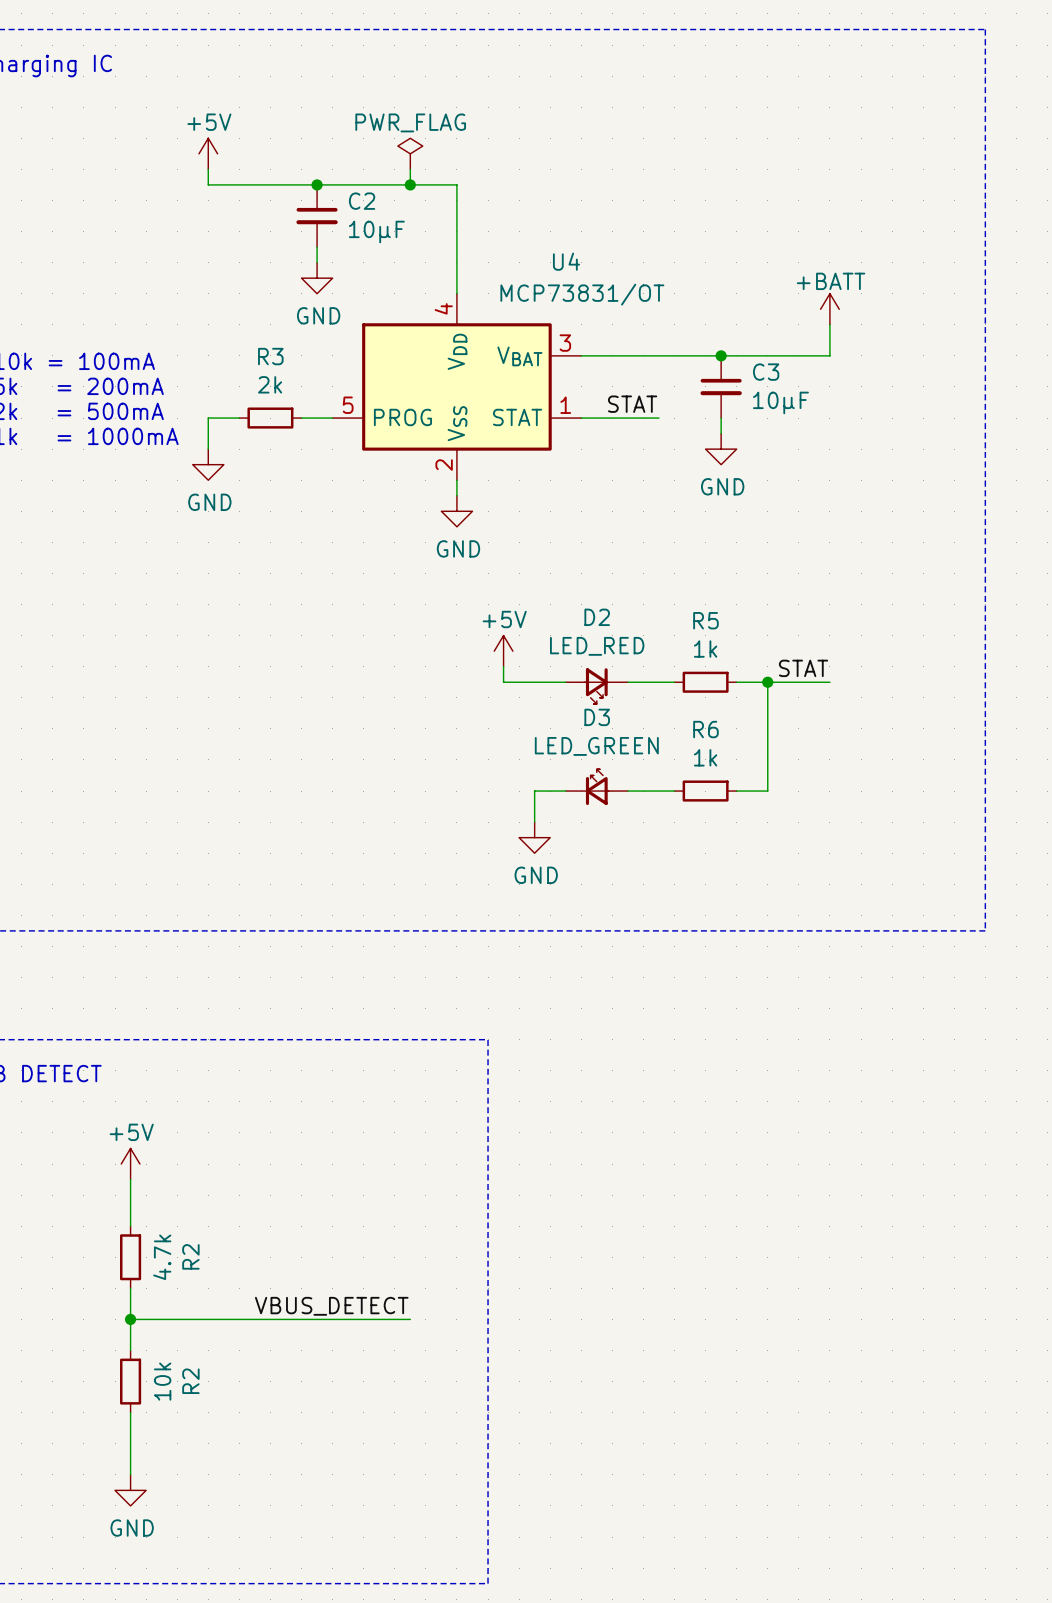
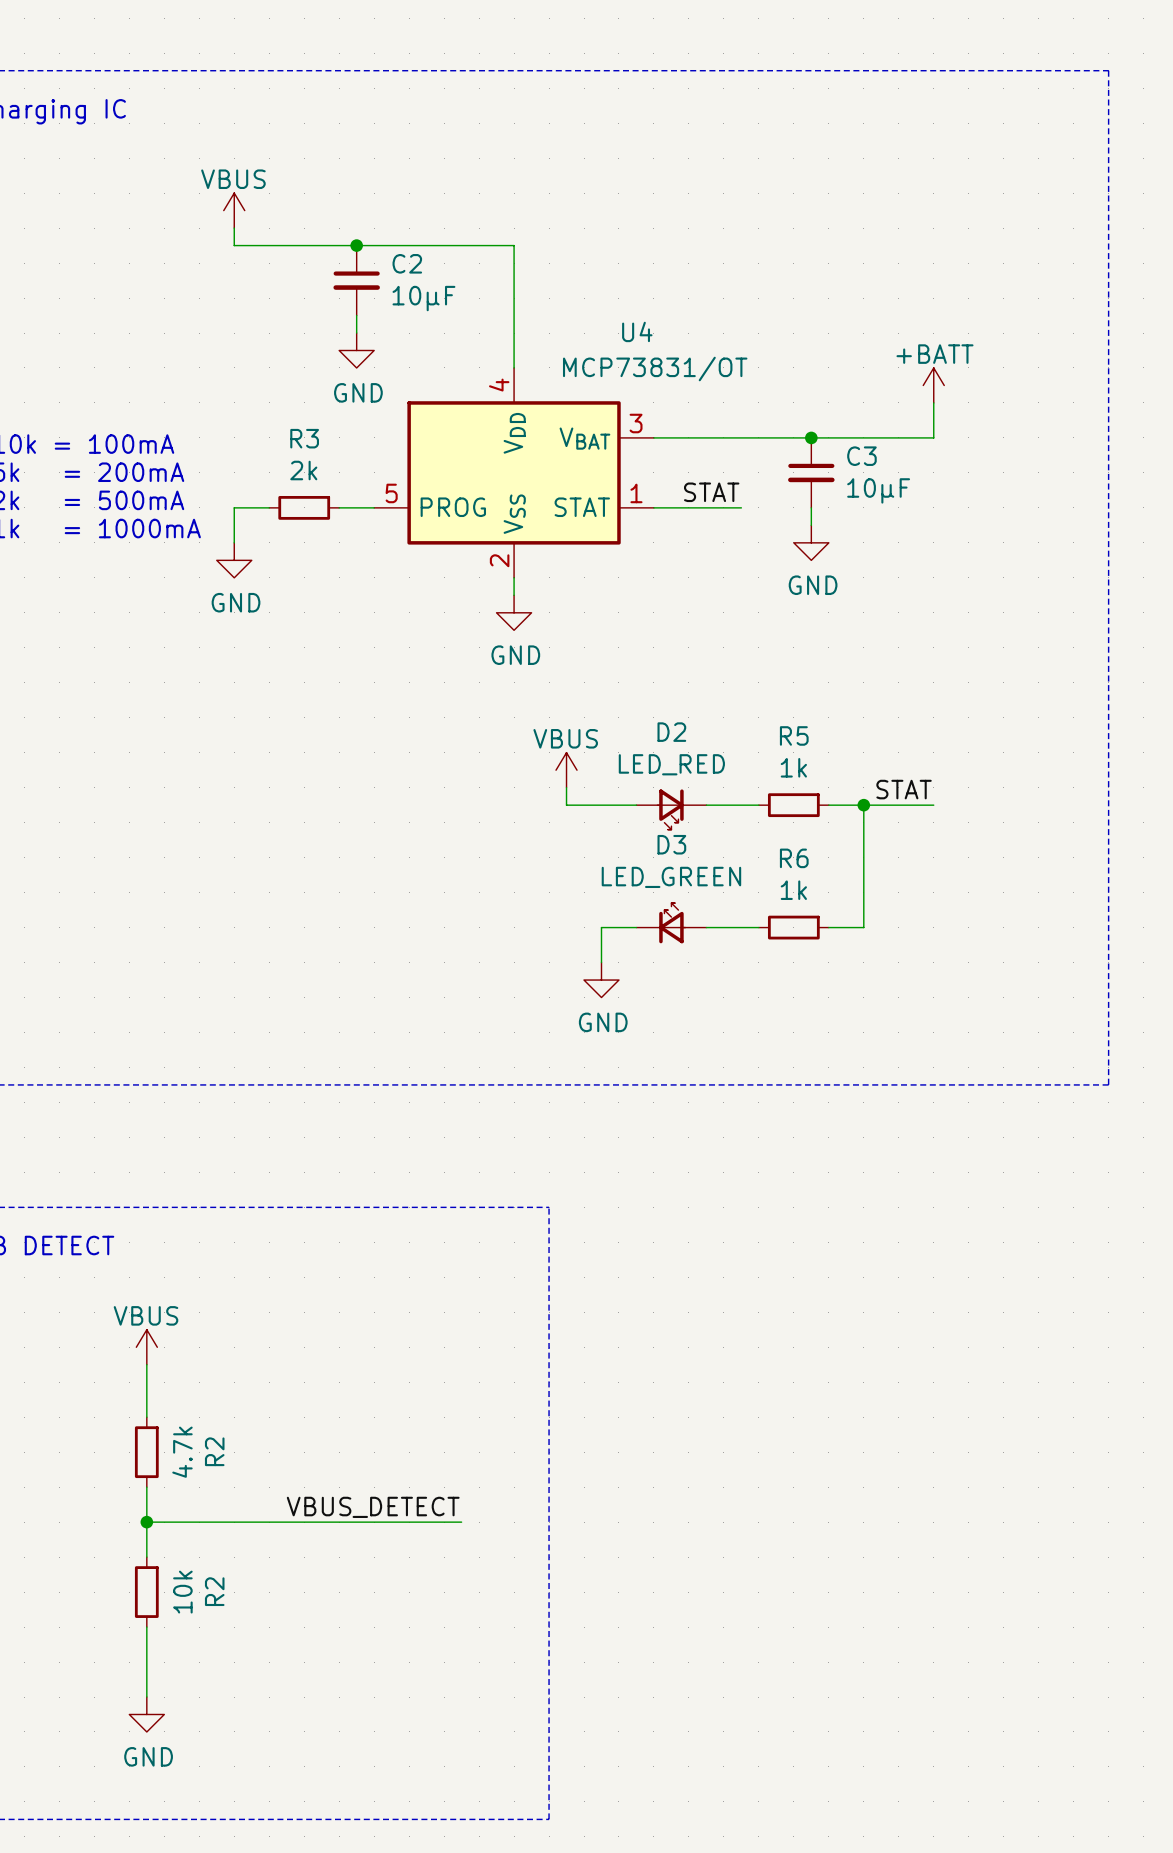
power symbol: +5V (208, 153) -> VBUS (234, 210)
power symbol: PWR_FLAG (410, 153) -> none
wire: (410, 169) (410, 184) -> none
junction: (410, 184) -> none
power symbol: +5V (503, 651) -> VBUS (566, 770)
power symbol: +5V (130, 1164) -> VBUS (146, 1347)

